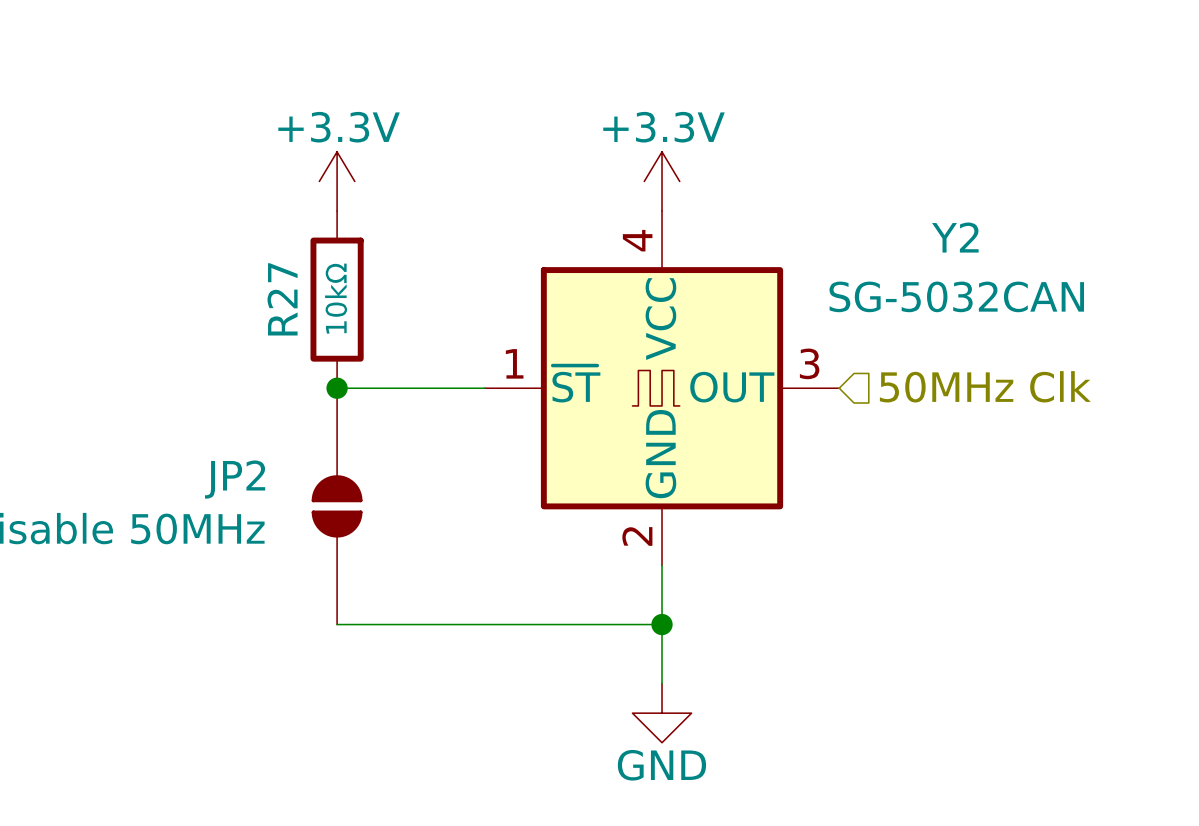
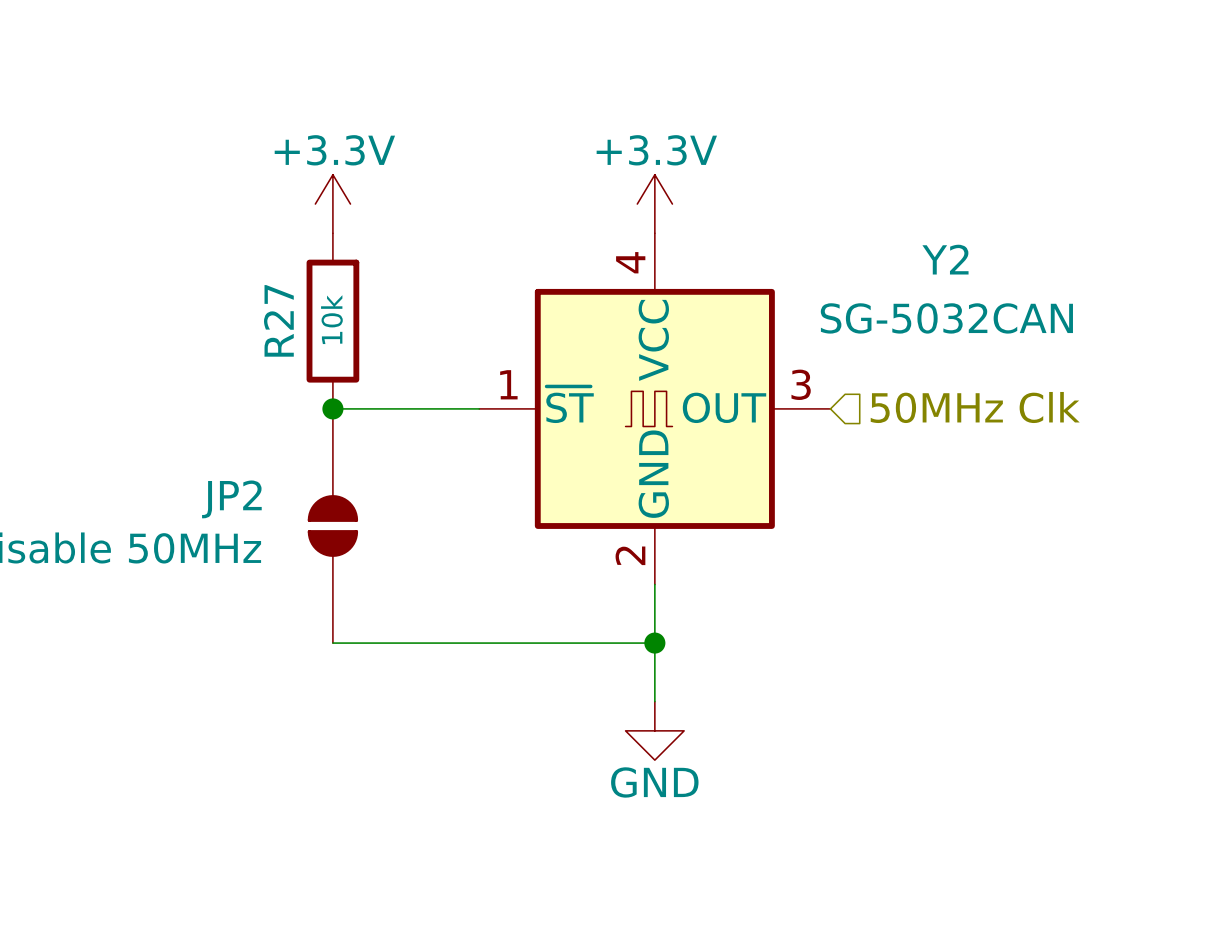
R27 value: 10kΩ (336, 298) -> 10k (331, 319)

